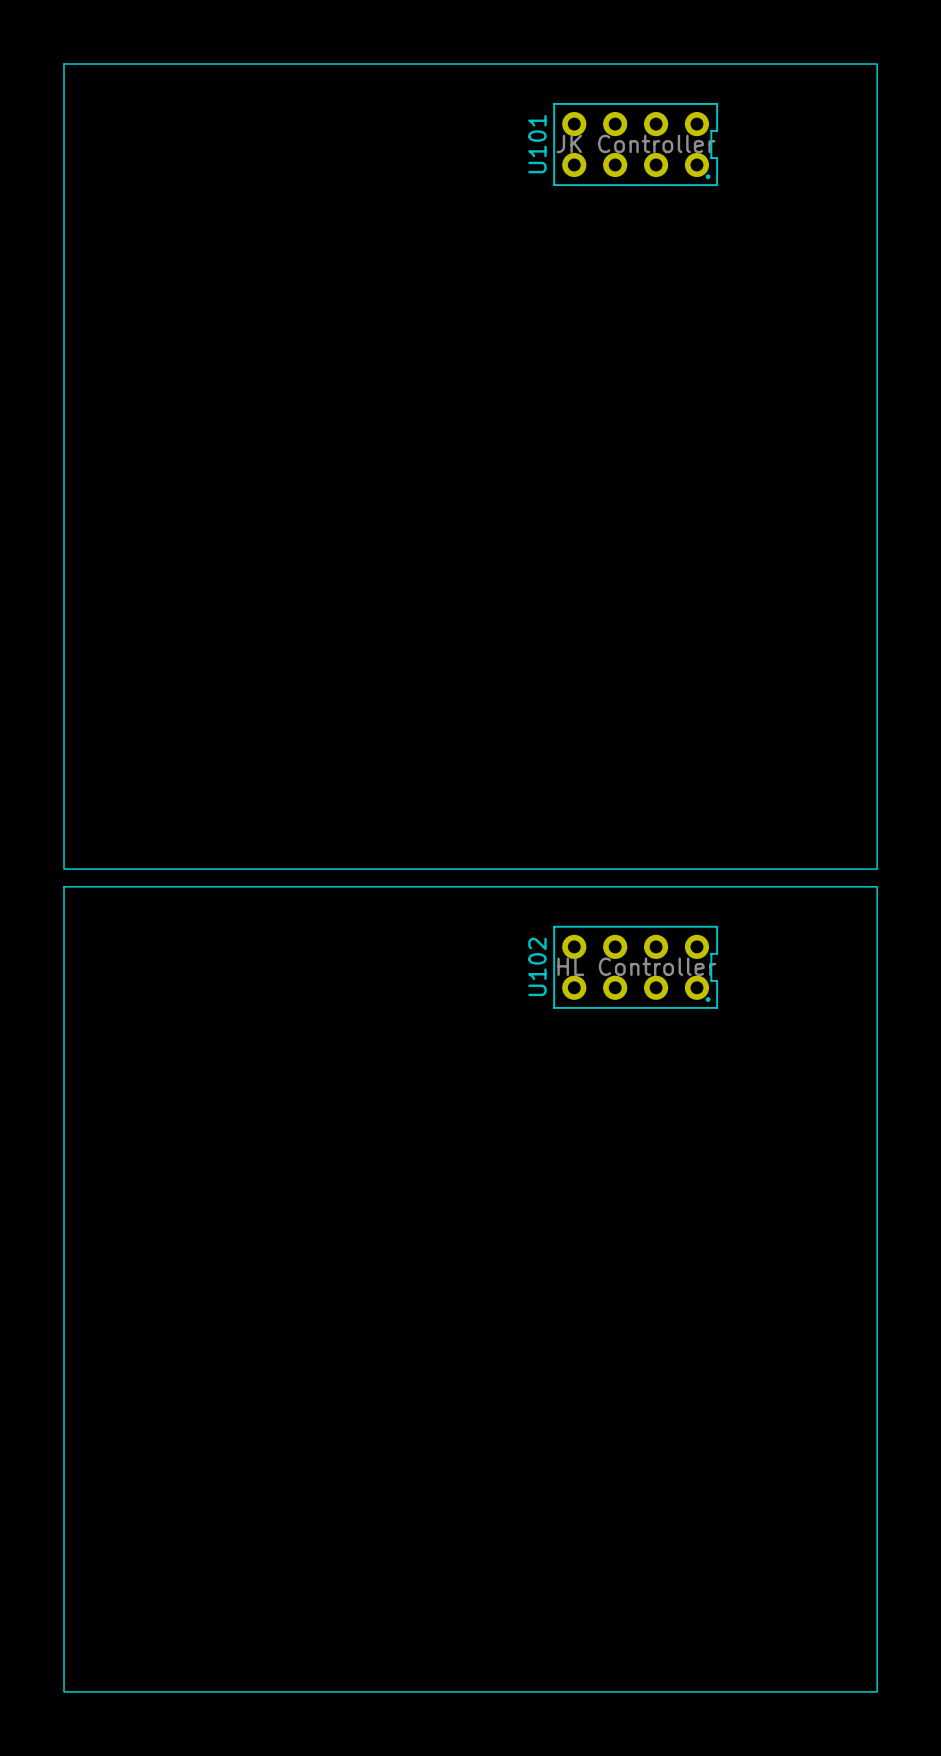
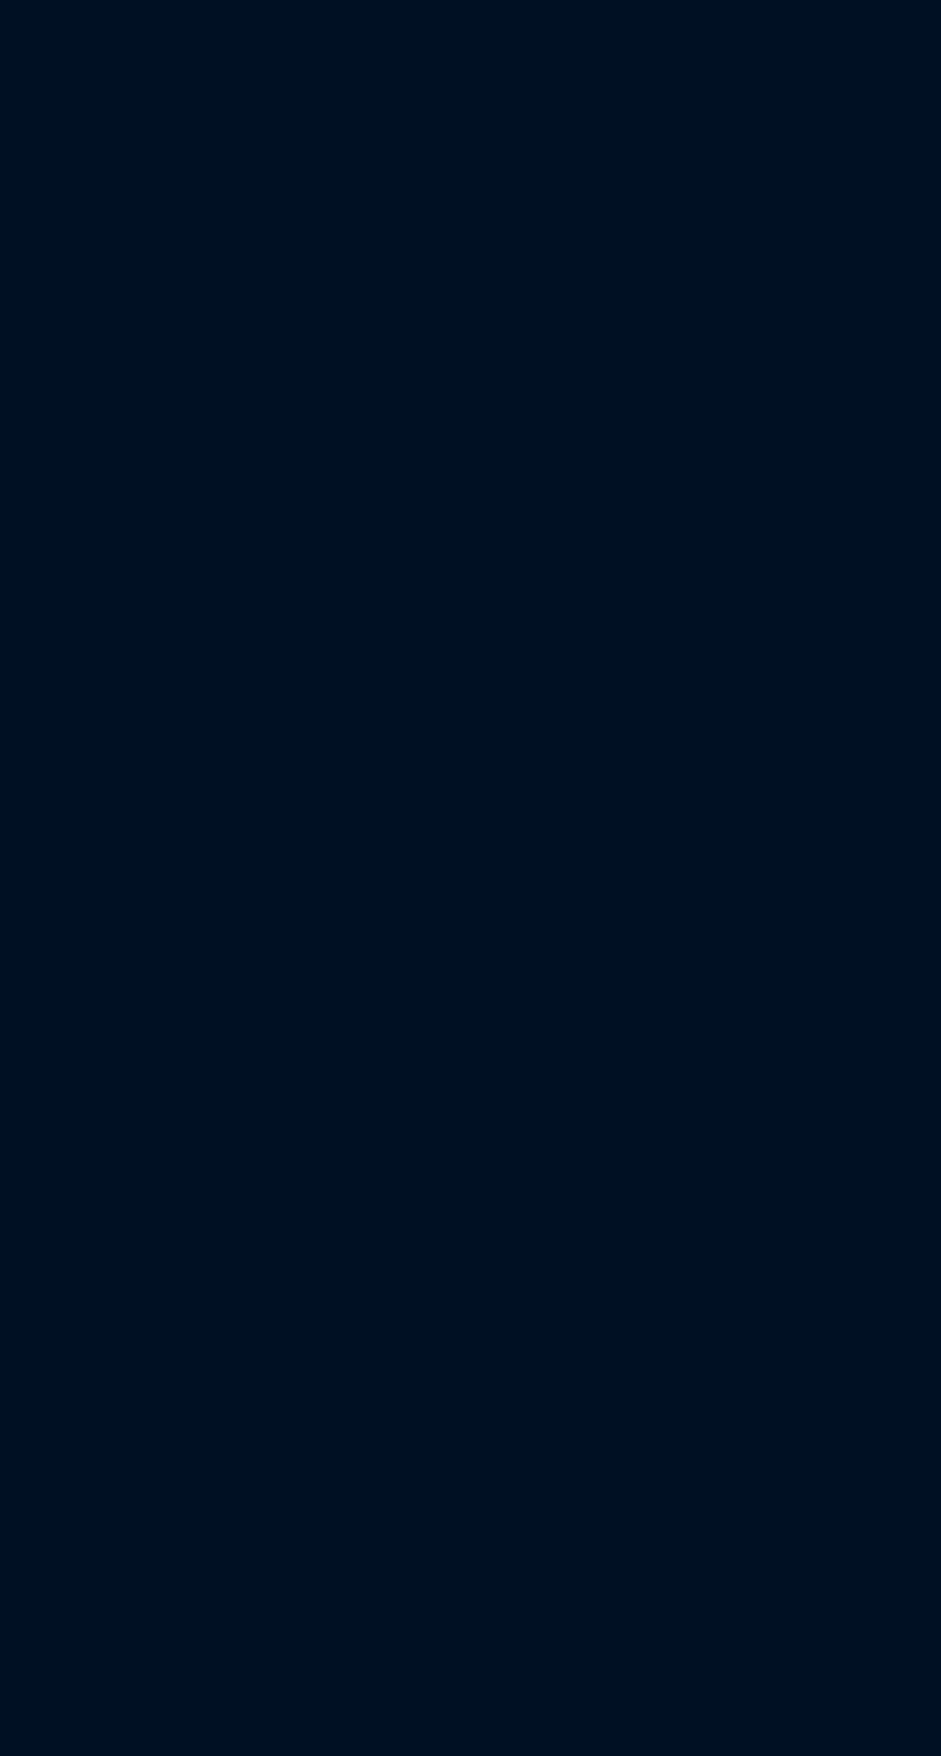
U101: JK Controller (470, 466) -> none
U102: HL Controller (470, 1289) -> none

